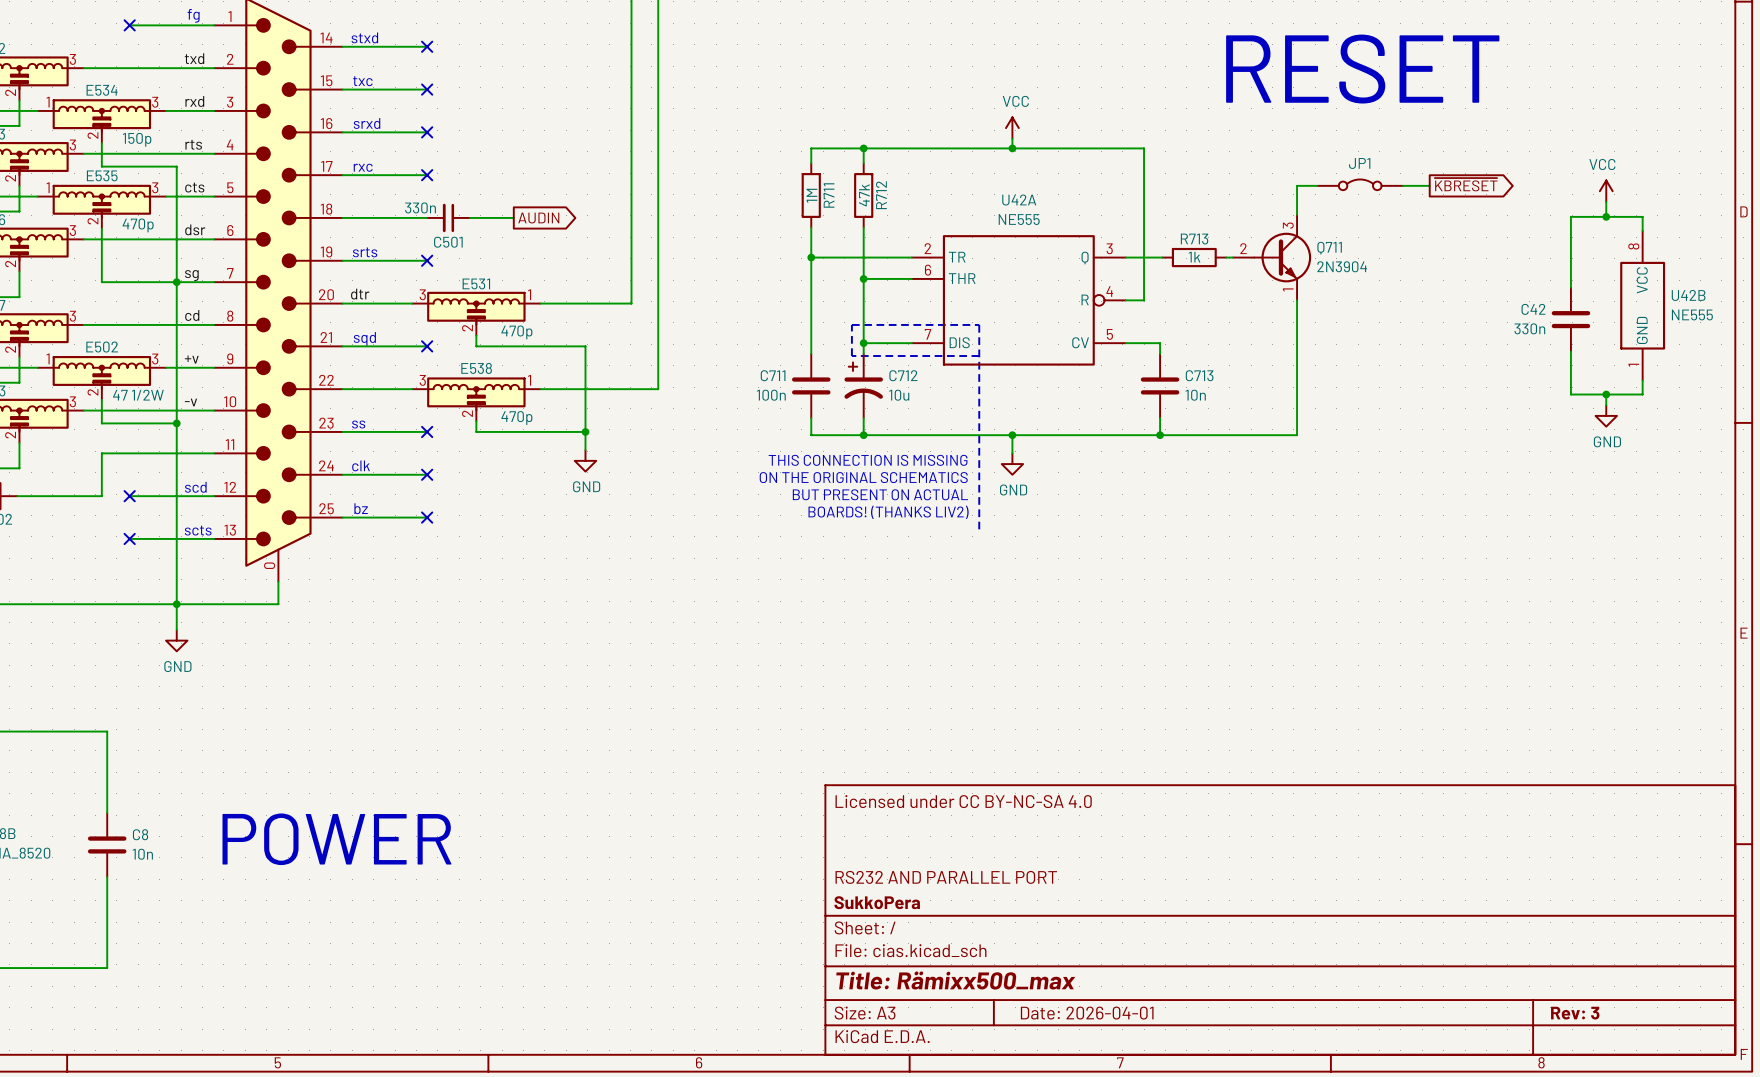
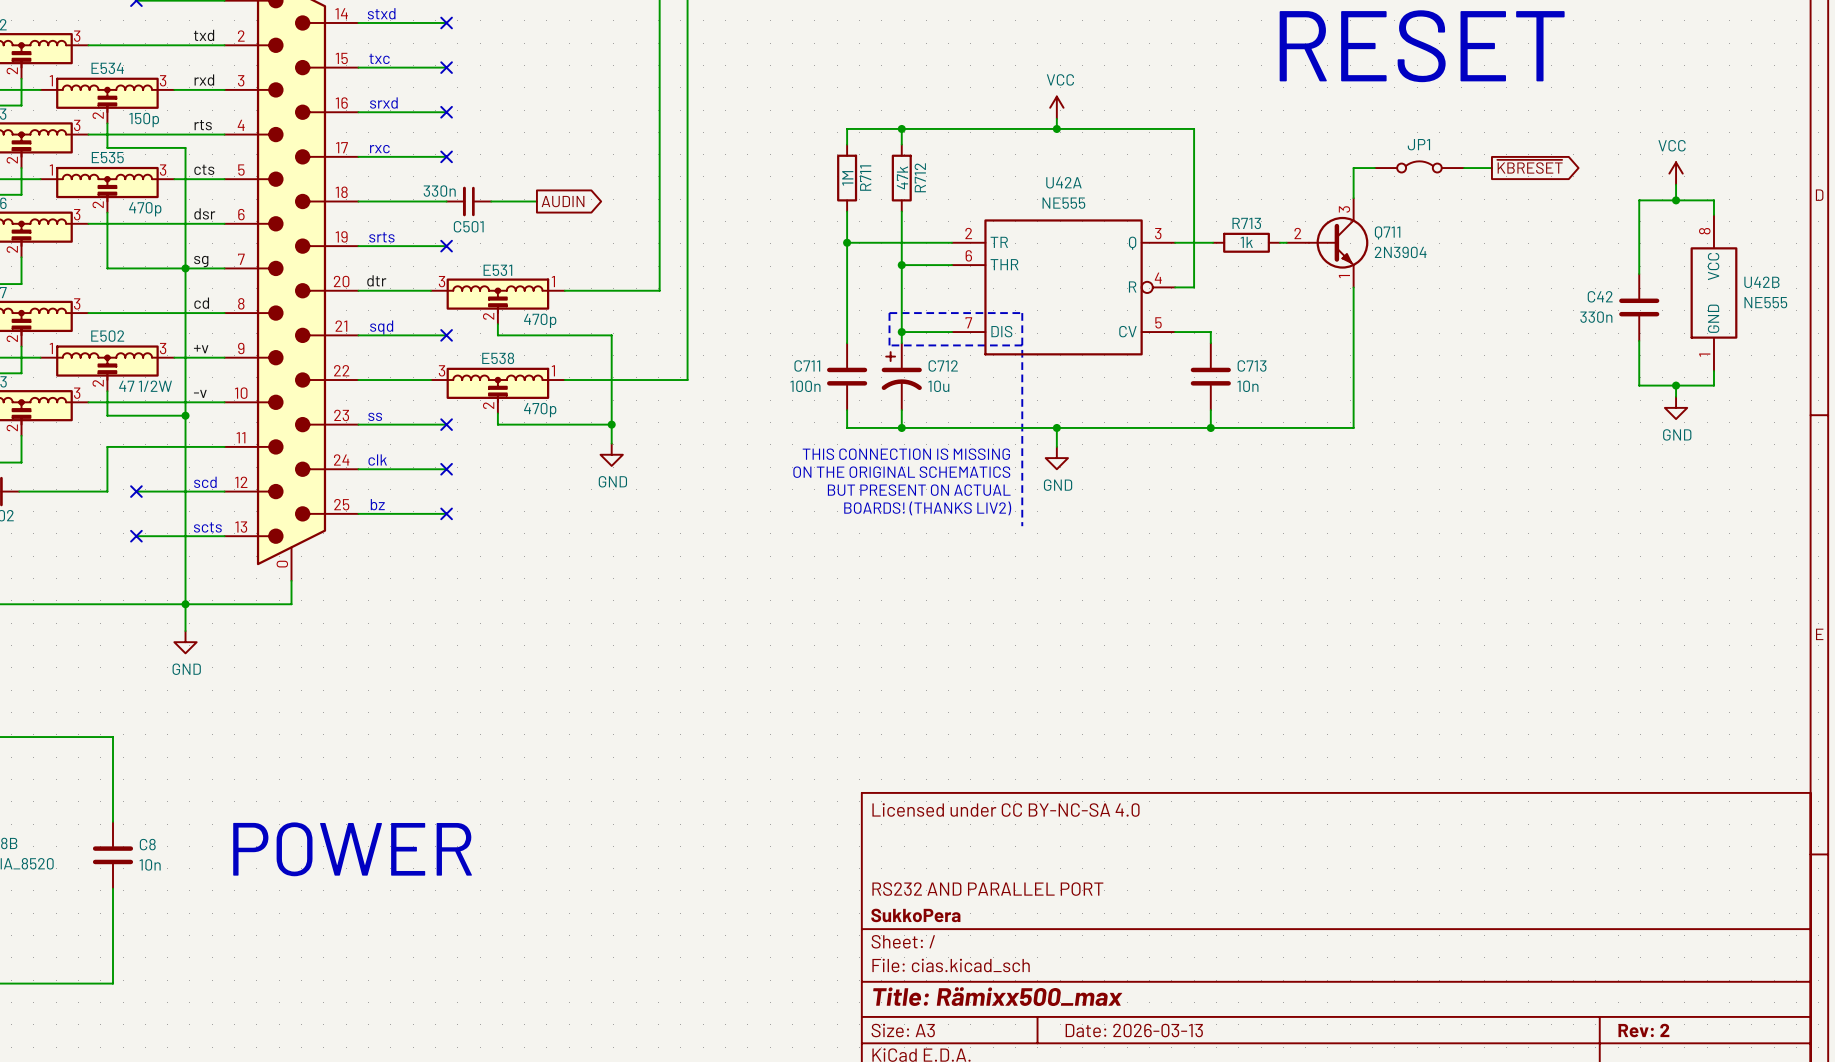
title block: Date: 2026-04-01 (1087, 1013) -> Date: 2026-03-13 (1134, 1030)
title block: Rev: 3 (1575, 1013) -> Rev: 2 (1643, 1030)

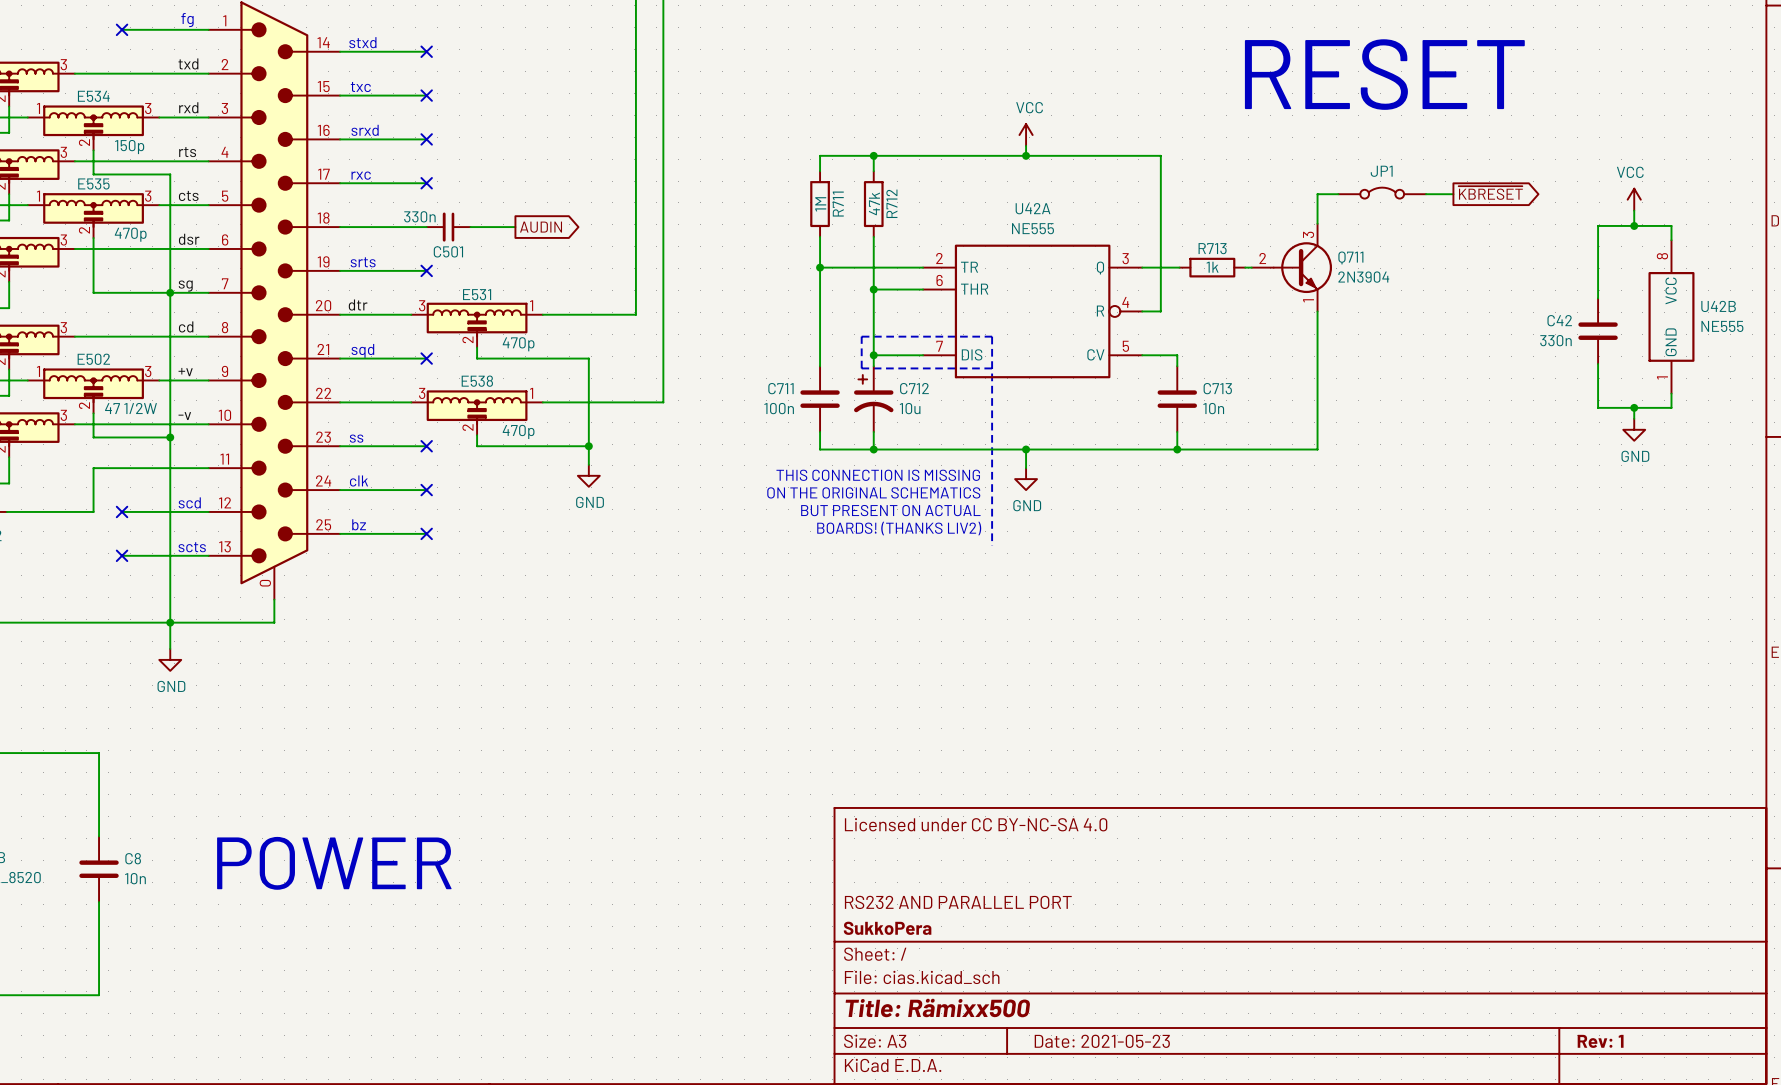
title block: Title: Rämixx500_max (997, 996) -> Title: Rämixx500 (937, 1008)
title block: Date: 2026-03-13 (1134, 1030) -> Date: 2021-05-23 (1102, 1041)
title block: Rev: 2 (1643, 1030) -> Rev: 1 (1600, 1041)

